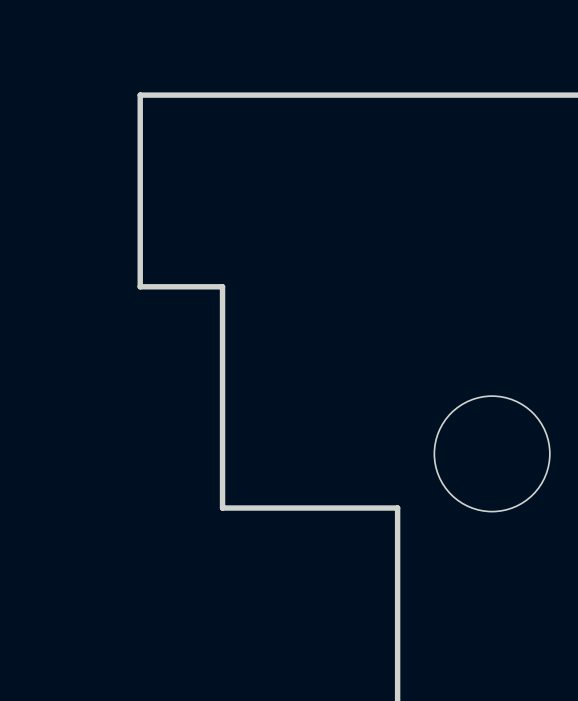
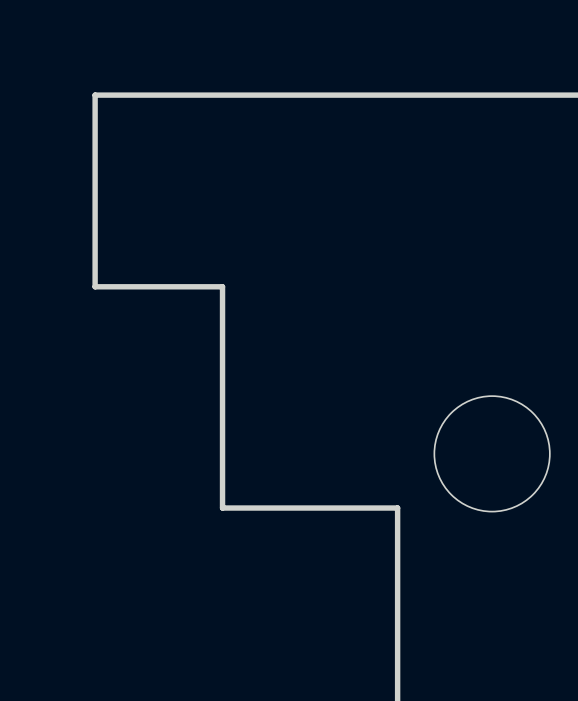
board edge: (140, 95) (140, 286) -> (140, 95) (95, 95) (95, 286) (140, 286)

